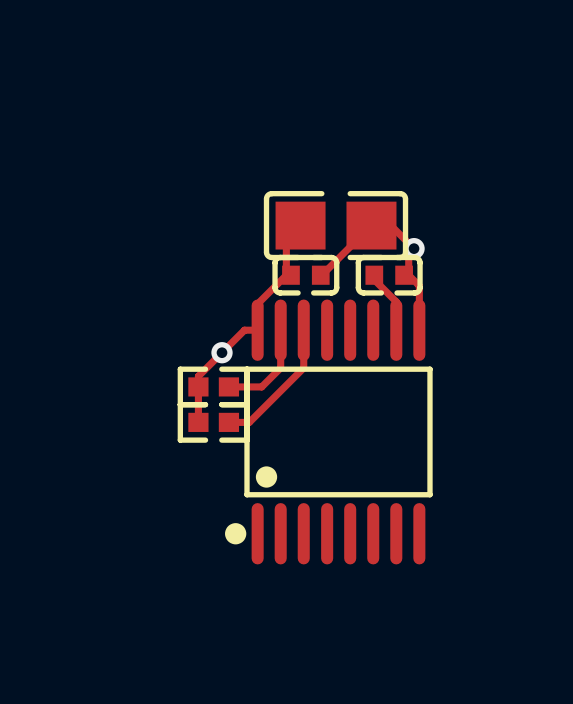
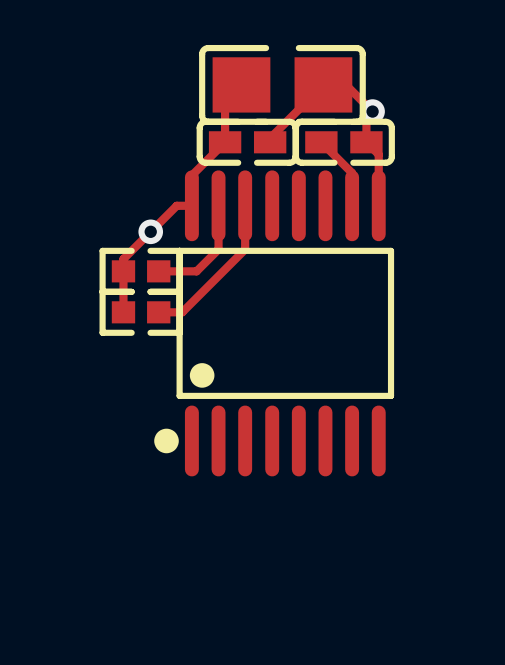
part footprint: [272, 254, 340, 296] -> [196, 118, 299, 166]
part footprint: [355, 254, 423, 296] -> [292, 118, 395, 166]

